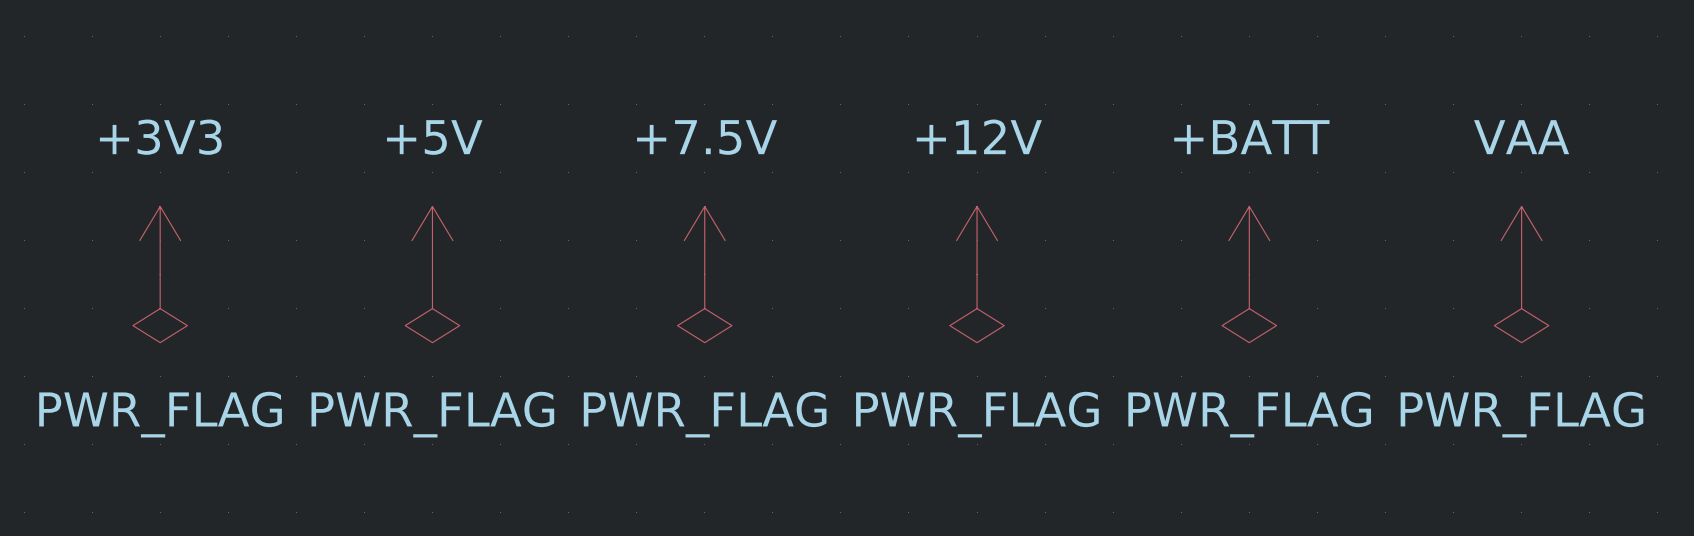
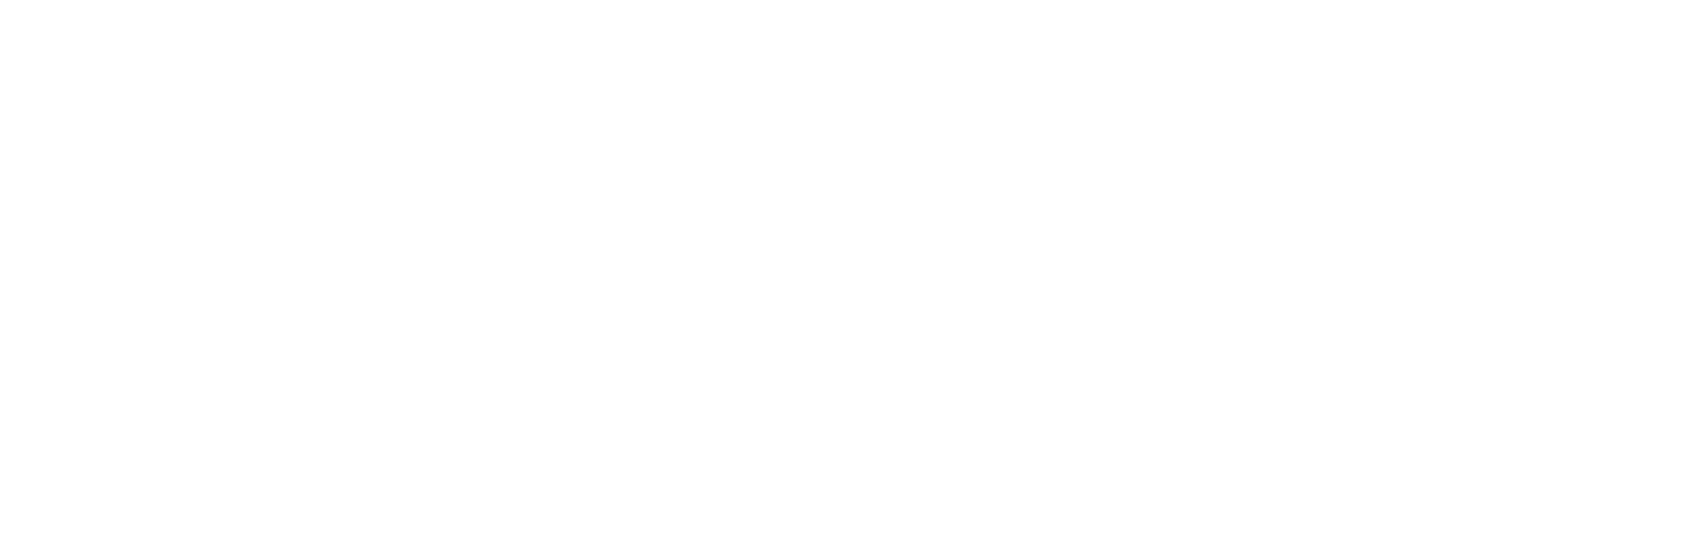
power symbol: +3V3 (160, 240) -> none
power symbol: +5V (432, 240) -> none
power symbol: +7.5V (704, 240) -> none
power symbol: +12V (977, 240) -> none
power symbol: +BATT (1249, 240) -> none
power symbol: VAA (1521, 240) -> none
power symbol: PWR_FLAG (160, 308) -> none
power symbol: PWR_FLAG (432, 308) -> none
power symbol: PWR_FLAG (704, 308) -> none
power symbol: PWR_FLAG (977, 308) -> none
power symbol: PWR_FLAG (1249, 308) -> none
power symbol: PWR_FLAG (1521, 308) -> none

